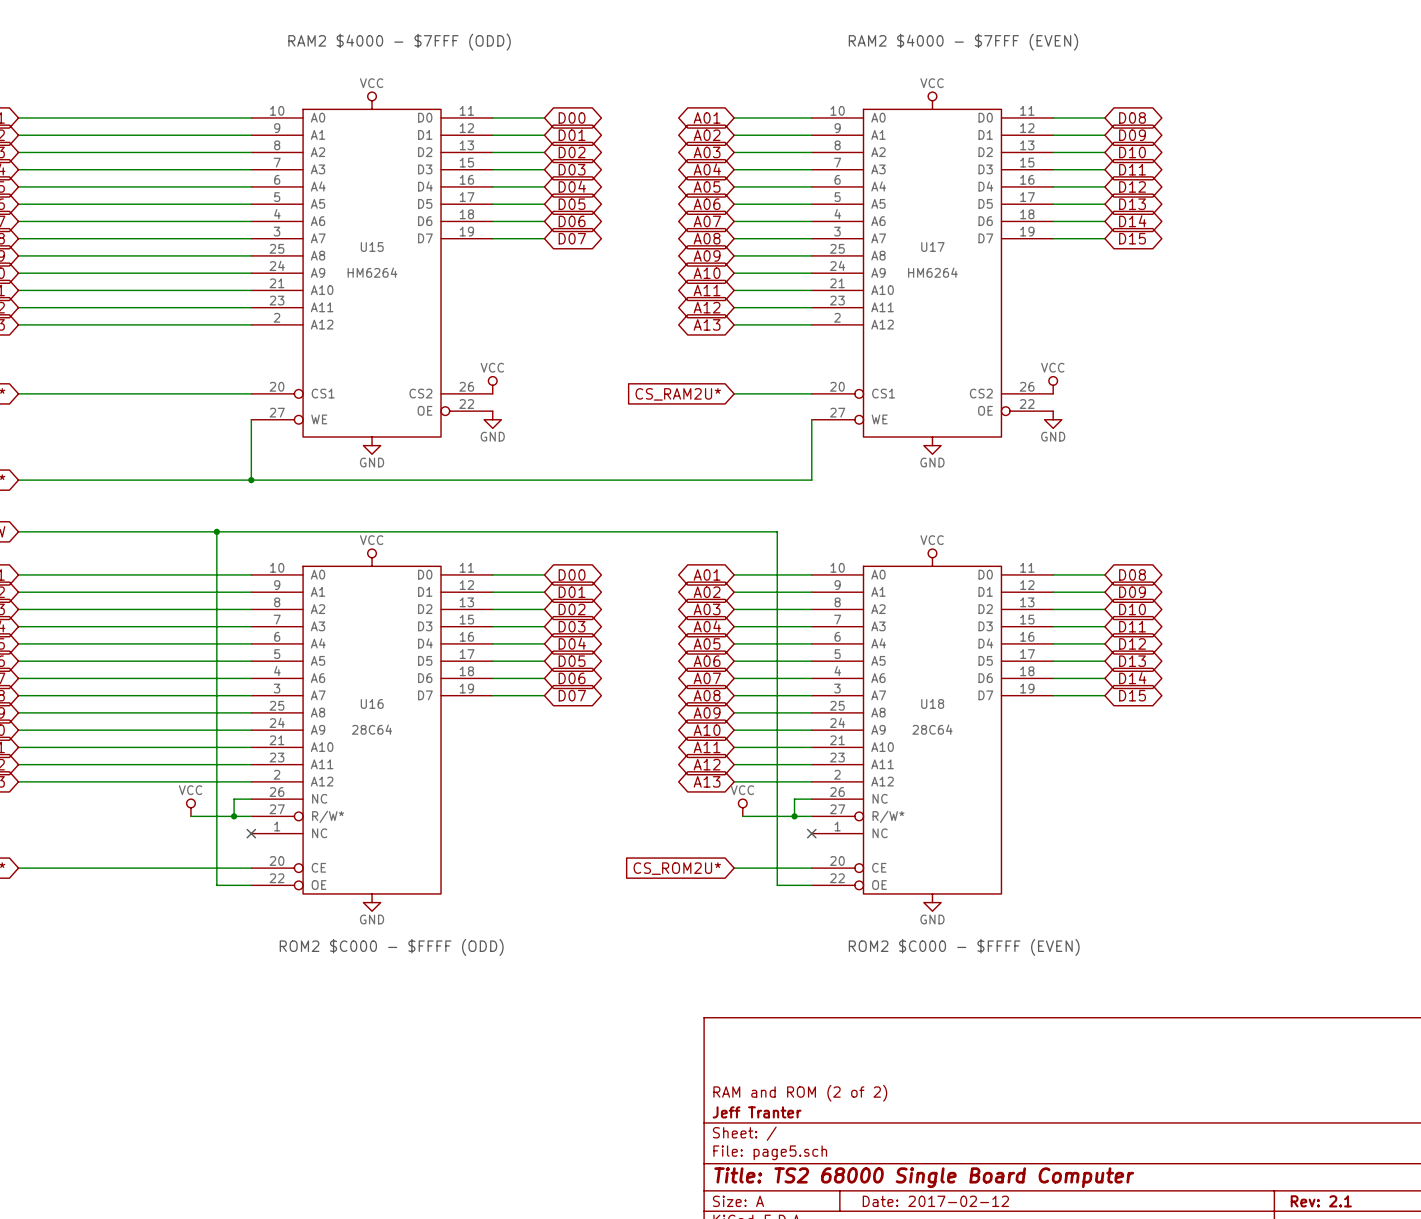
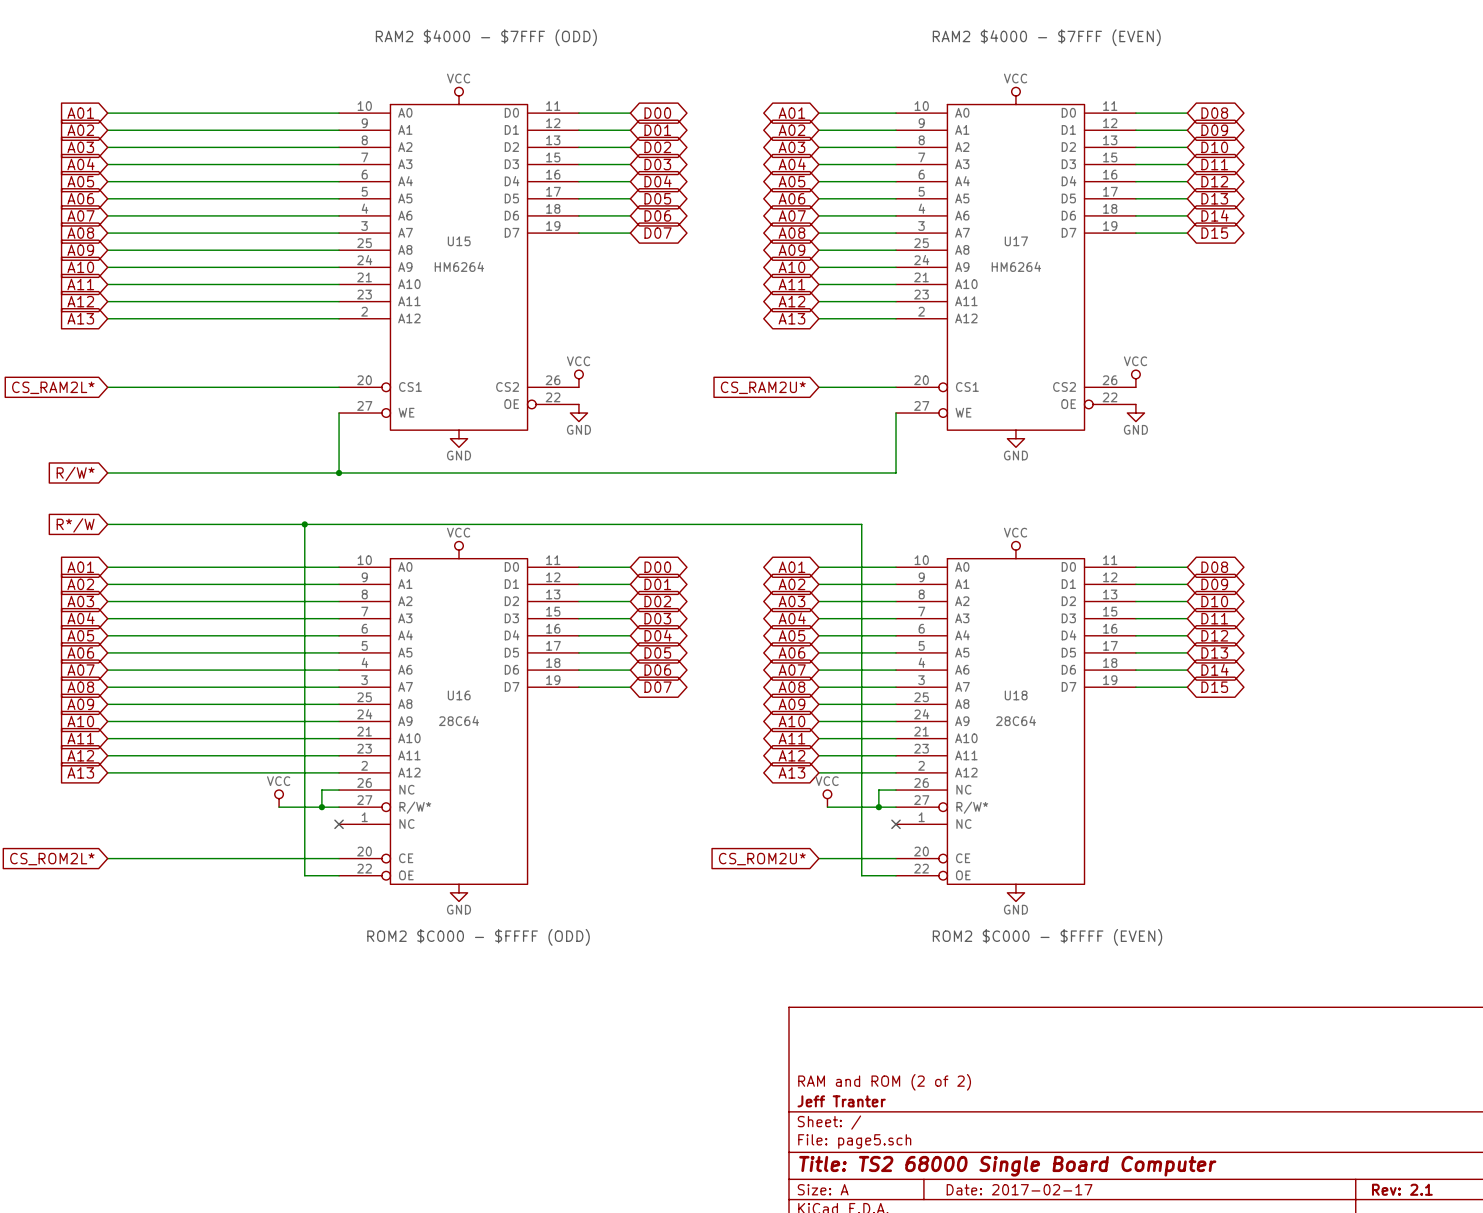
title block: Date: 2017-02-12 (935, 1201) -> Date: 2017-02-17 (1019, 1189)

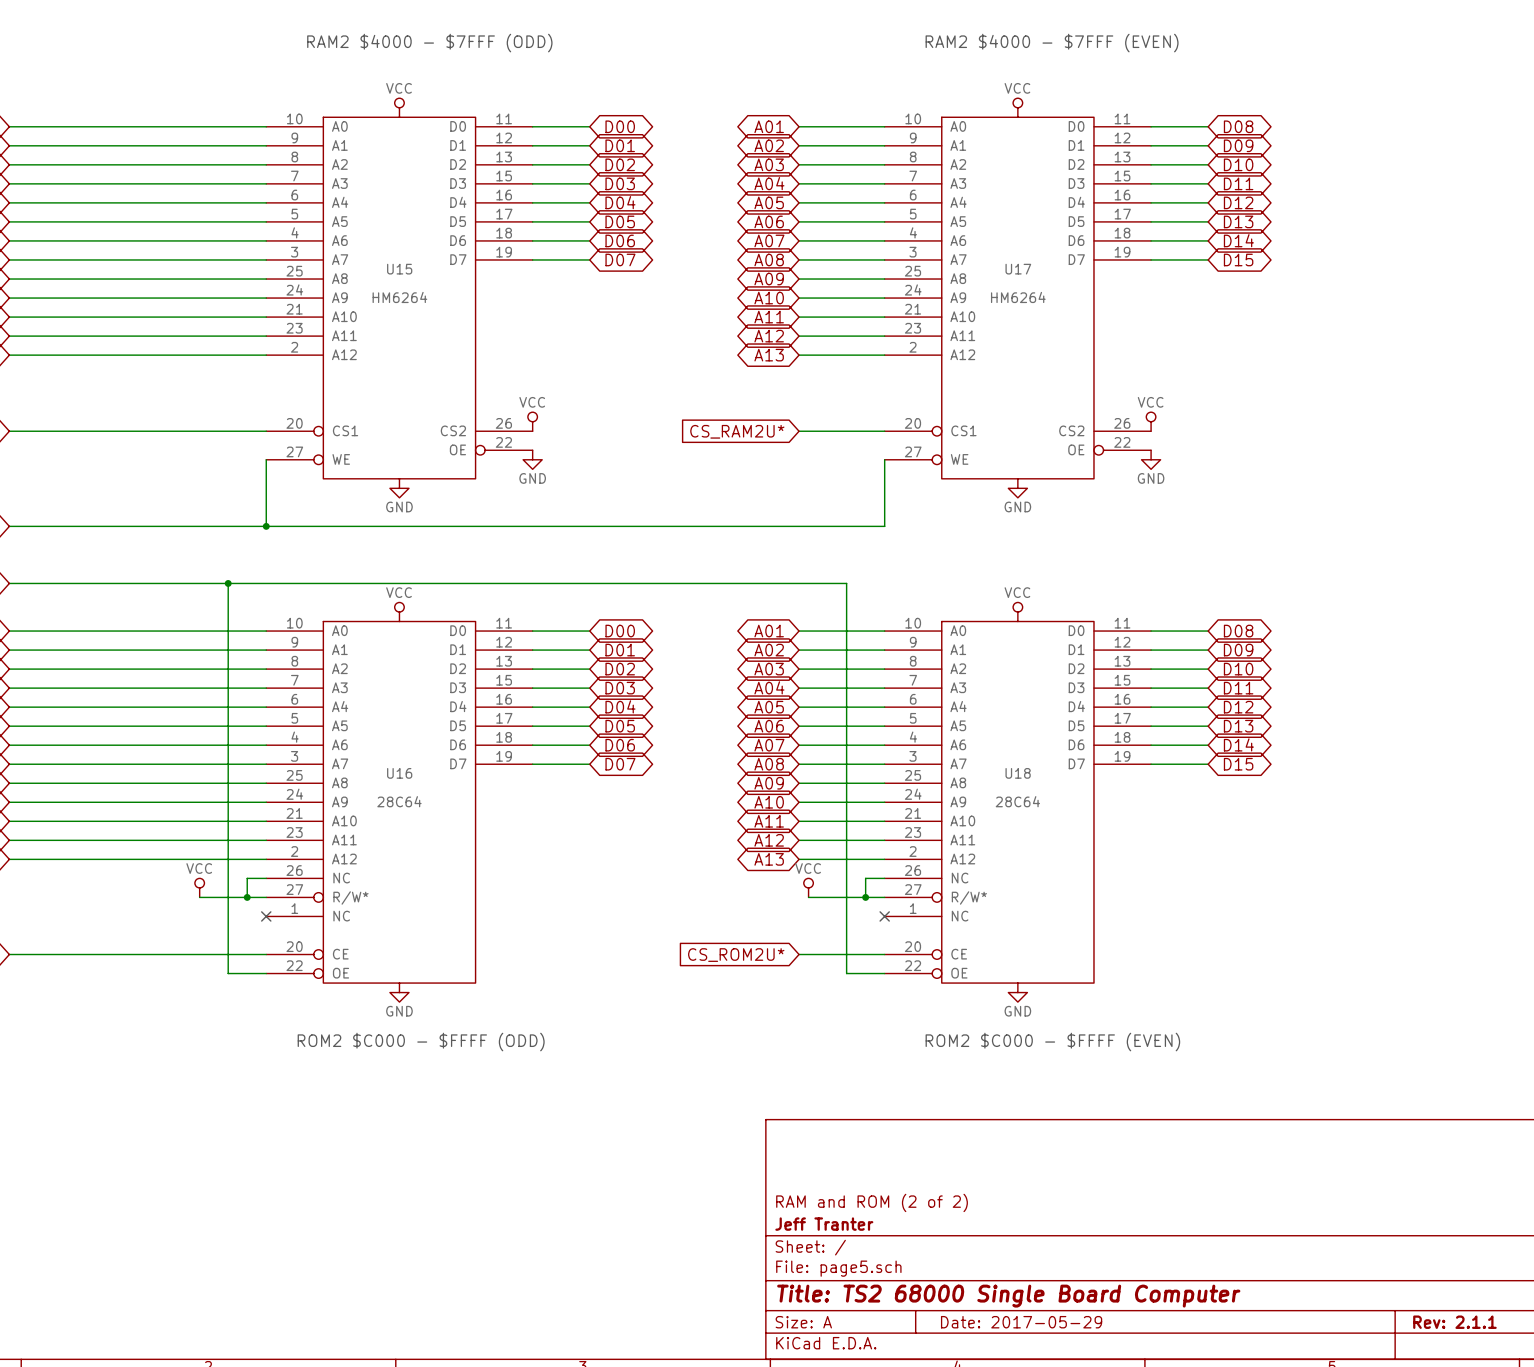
title block: Date: 2017-02-17 (1019, 1189) -> Date: 2017-05-29 (1021, 1322)
title block: Rev: 2.1 (1402, 1189) -> Rev: 2.1.1 (1454, 1322)

